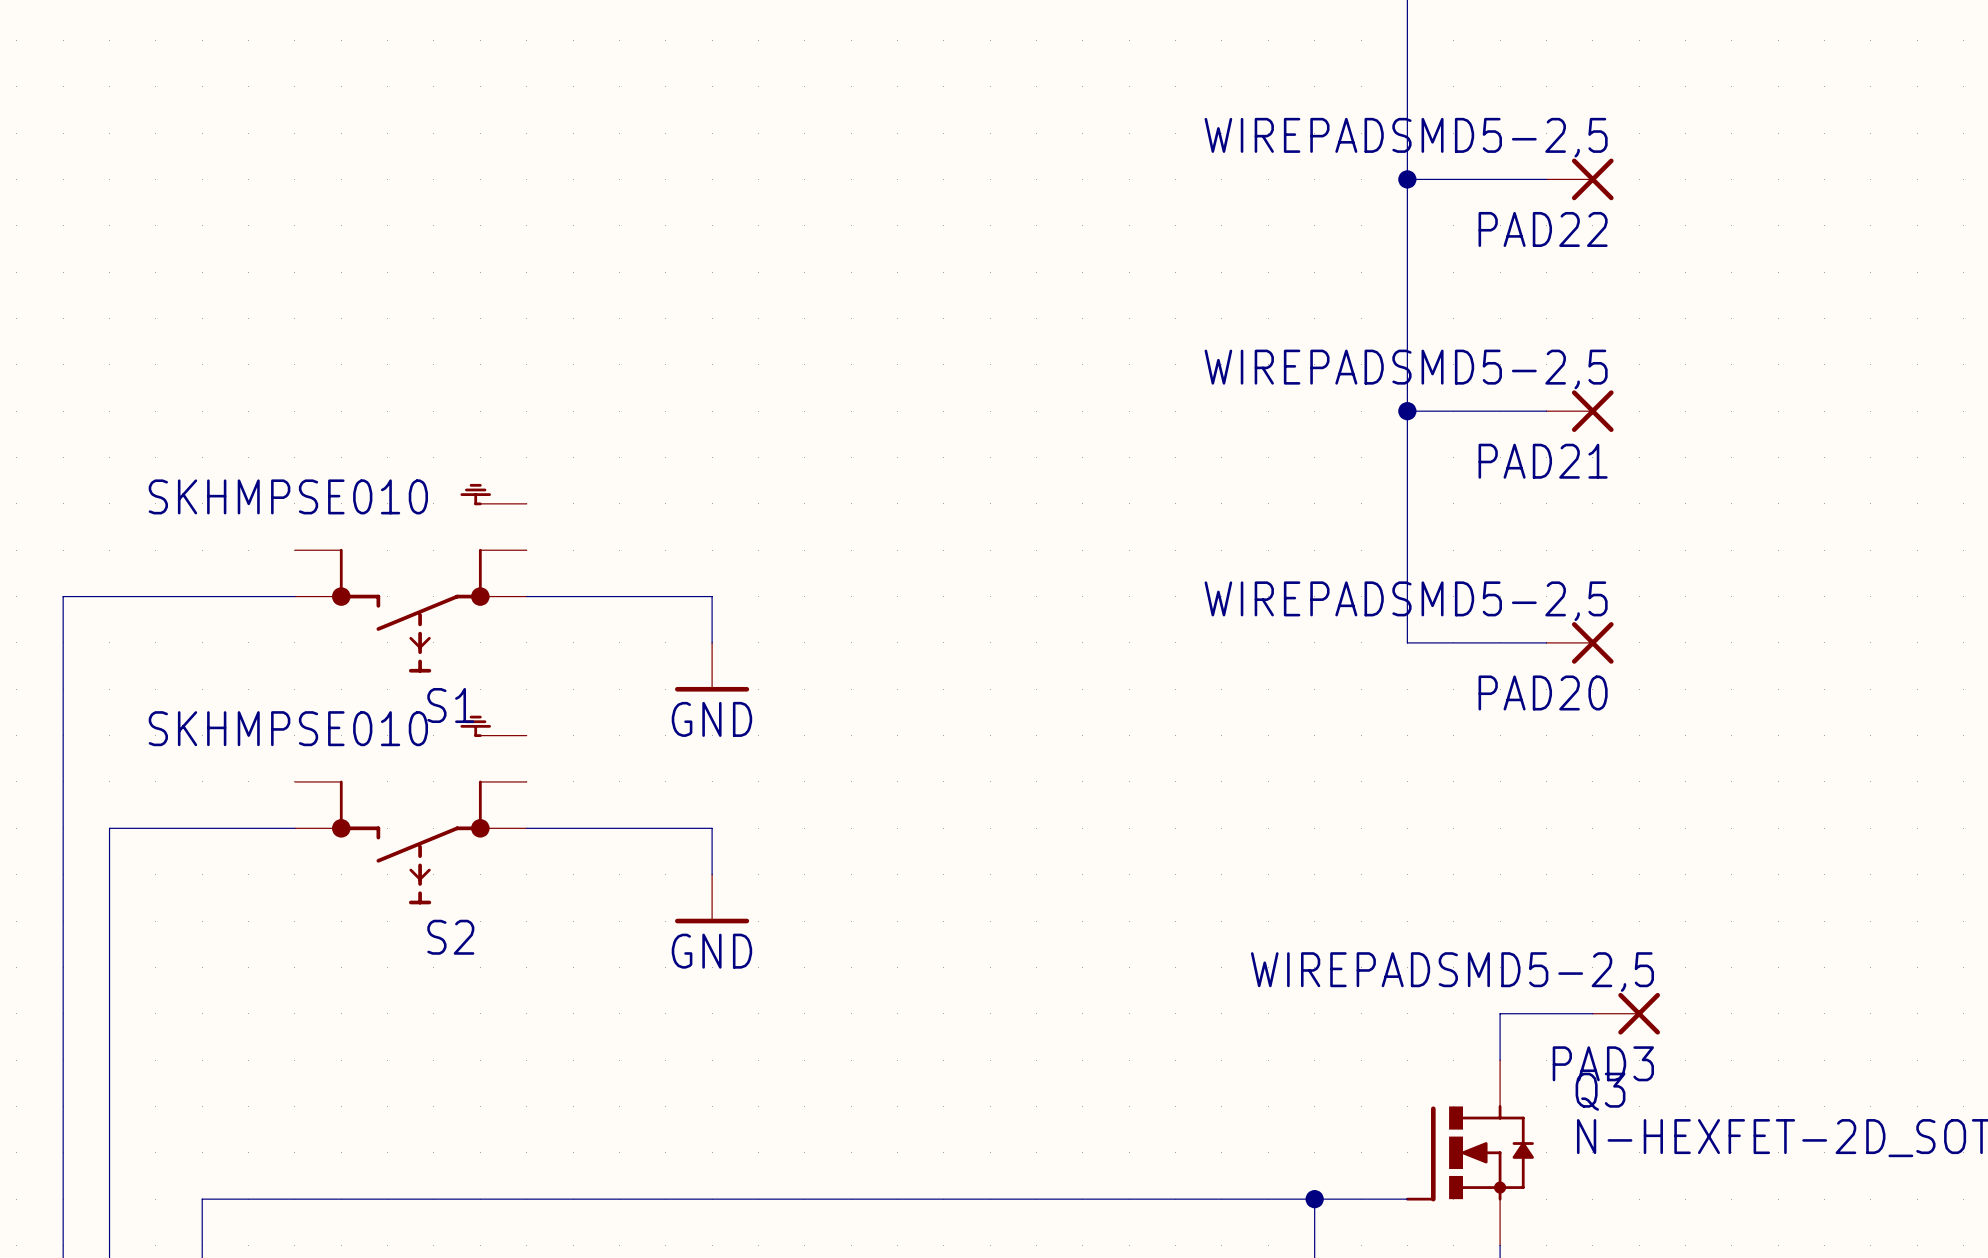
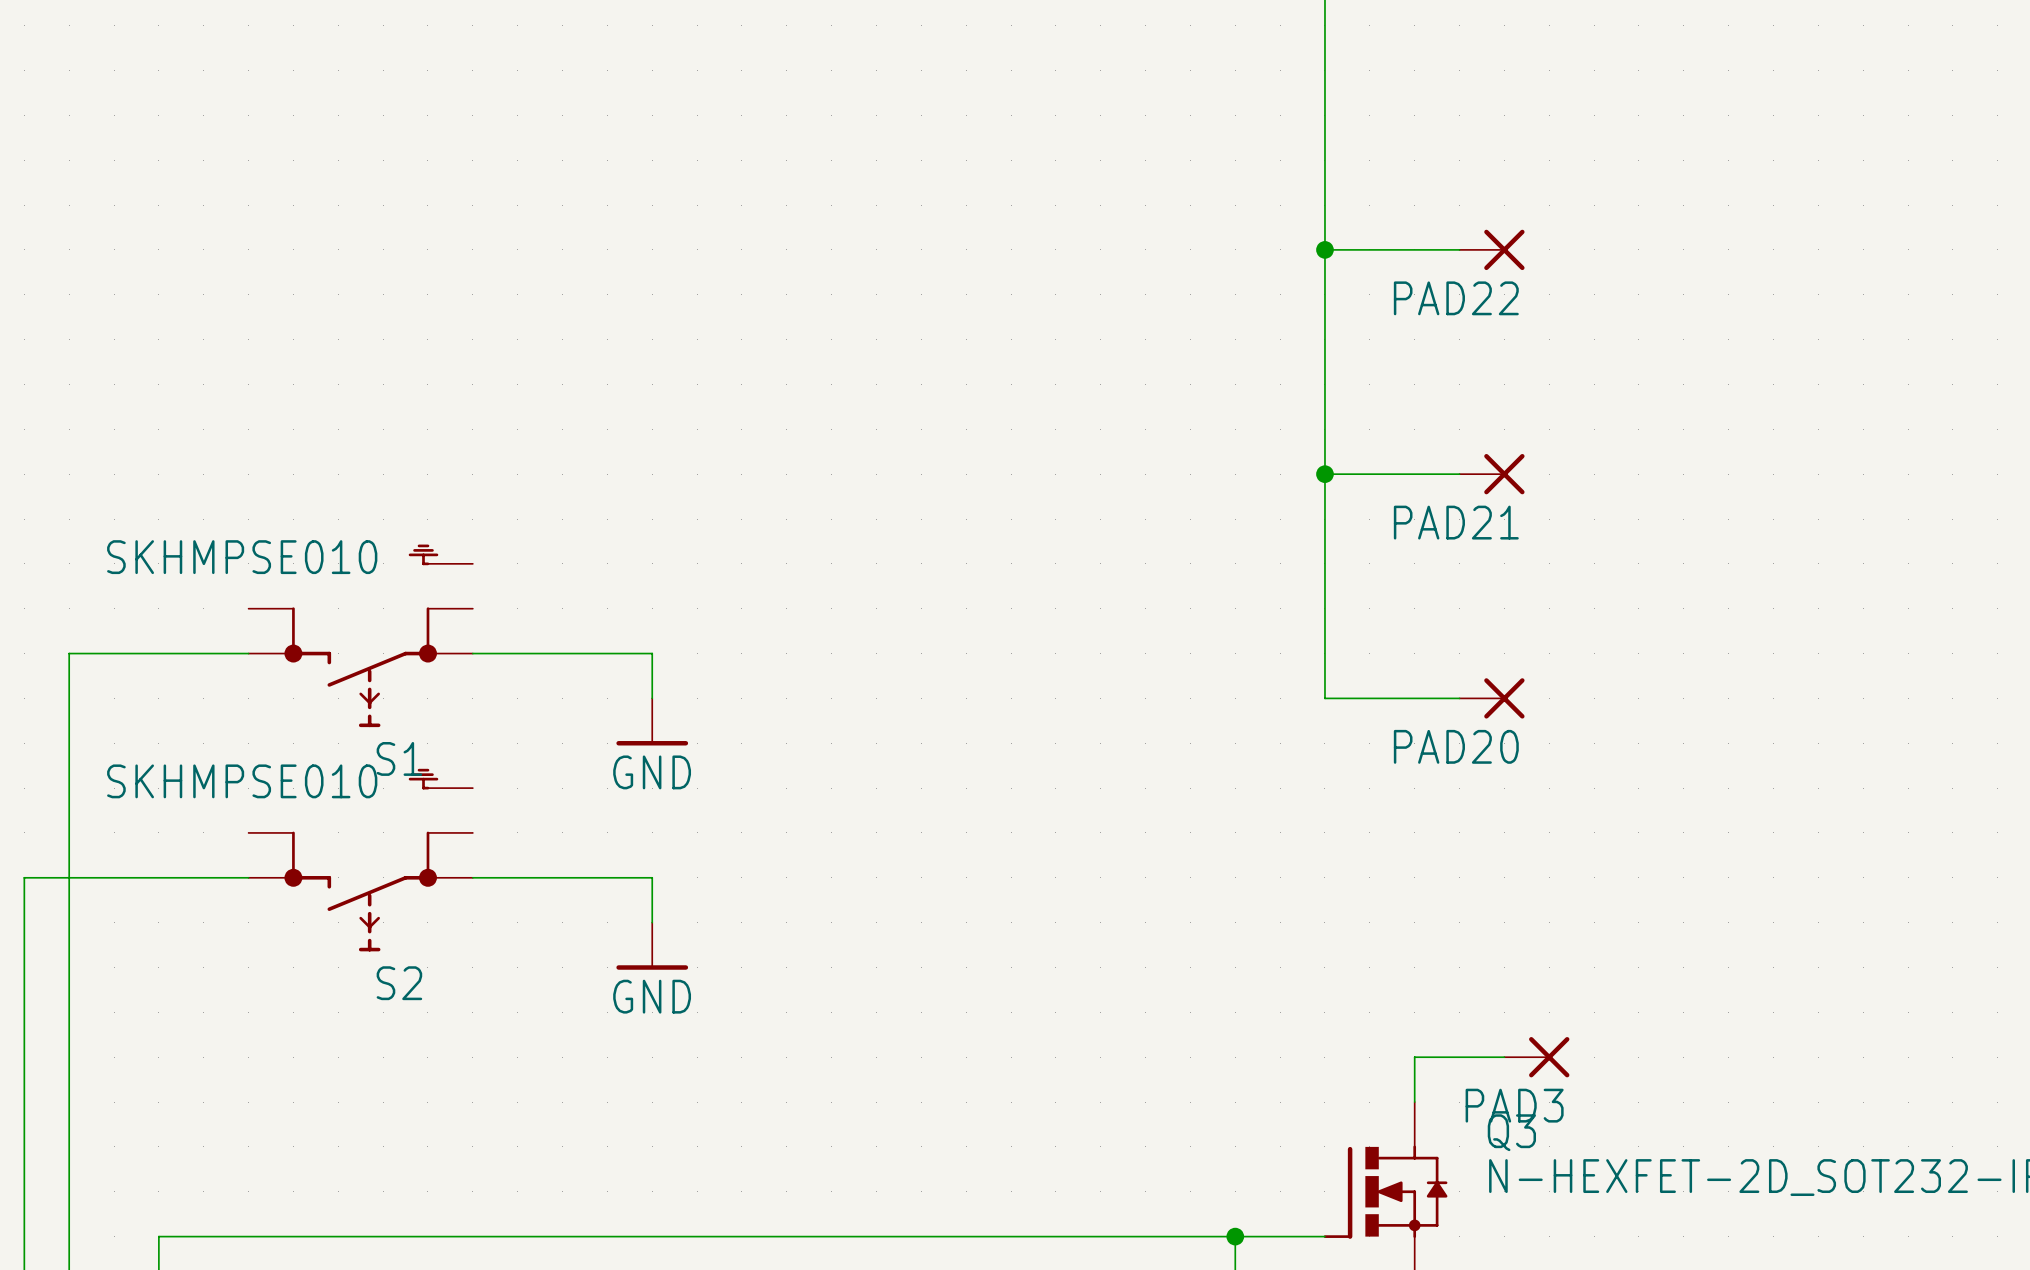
PAD22 value: WIREPADSMD5-2,5 (1406, 137) -> none
PAD21 value: WIREPADSMD5-2,5 (1406, 369) -> none
wire: (109, 596) (63, 596) (63, 828) -> (69, 653) (69, 877) (24, 877)
PAD20 value: WIREPADSMD5-2,5 (1406, 601) -> none
PAD3 value: WIREPADSMD5-2,5 (1452, 972) -> none

